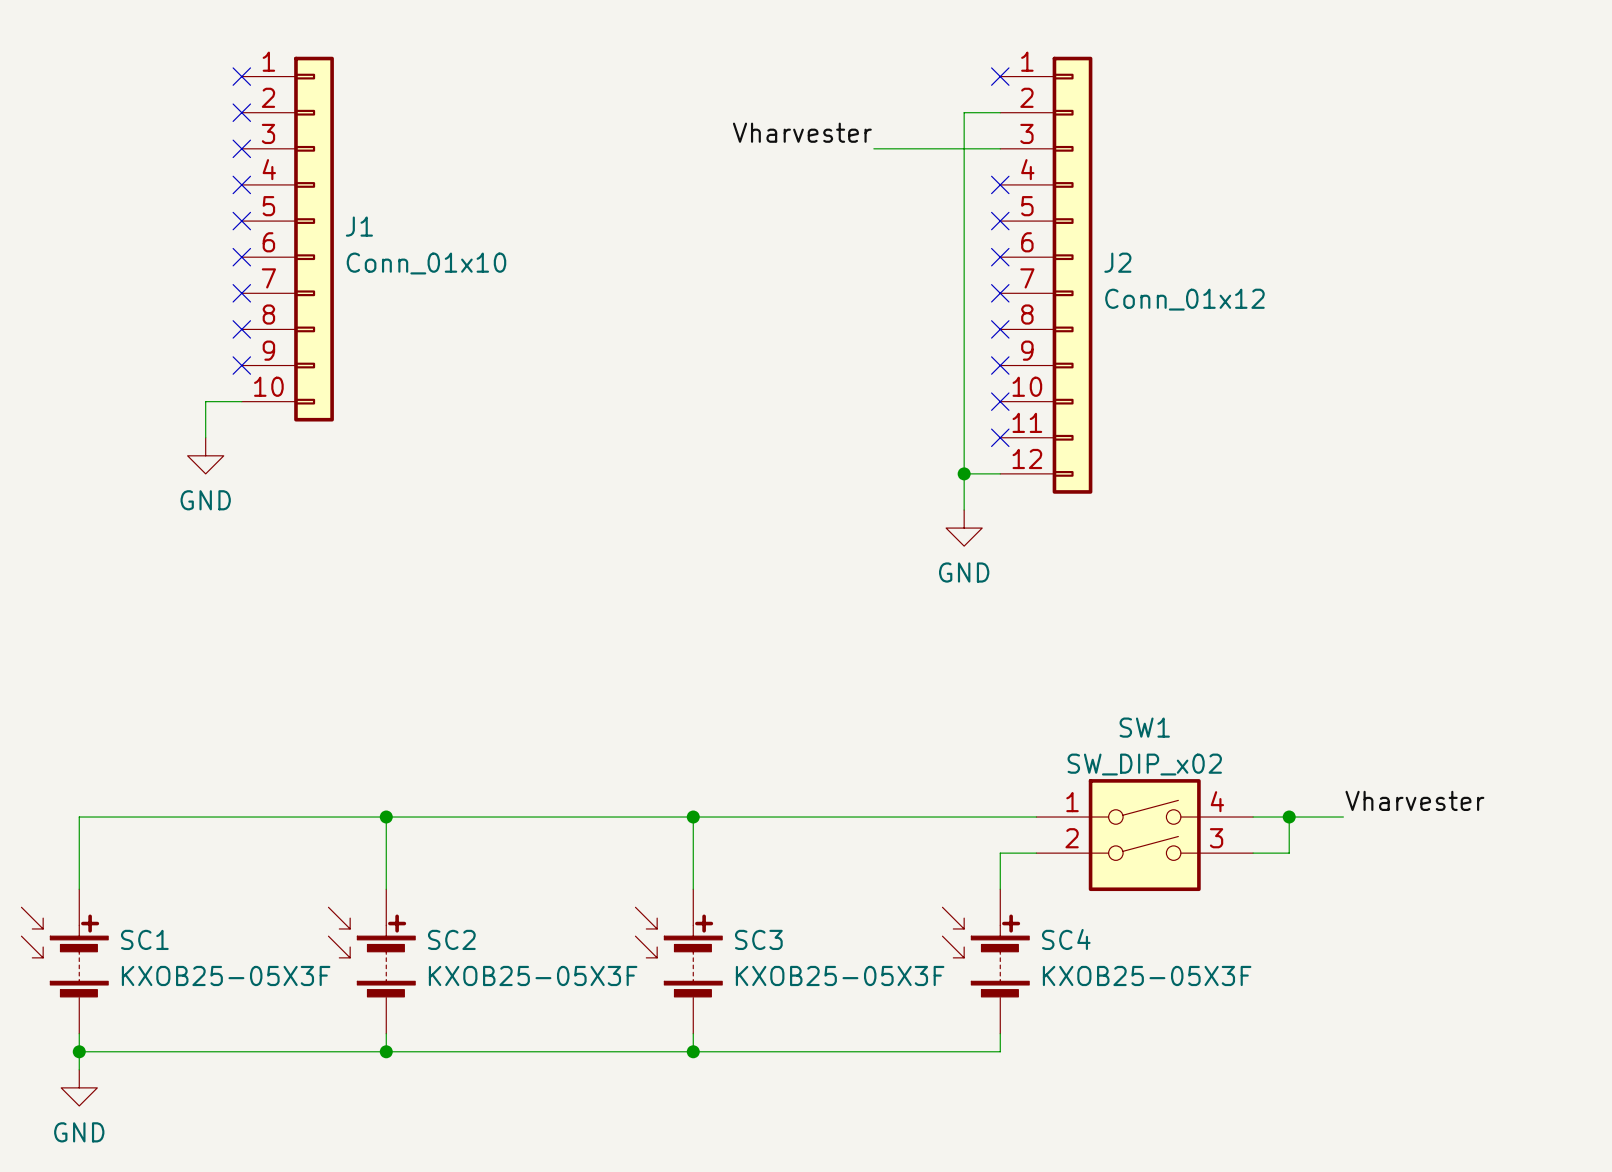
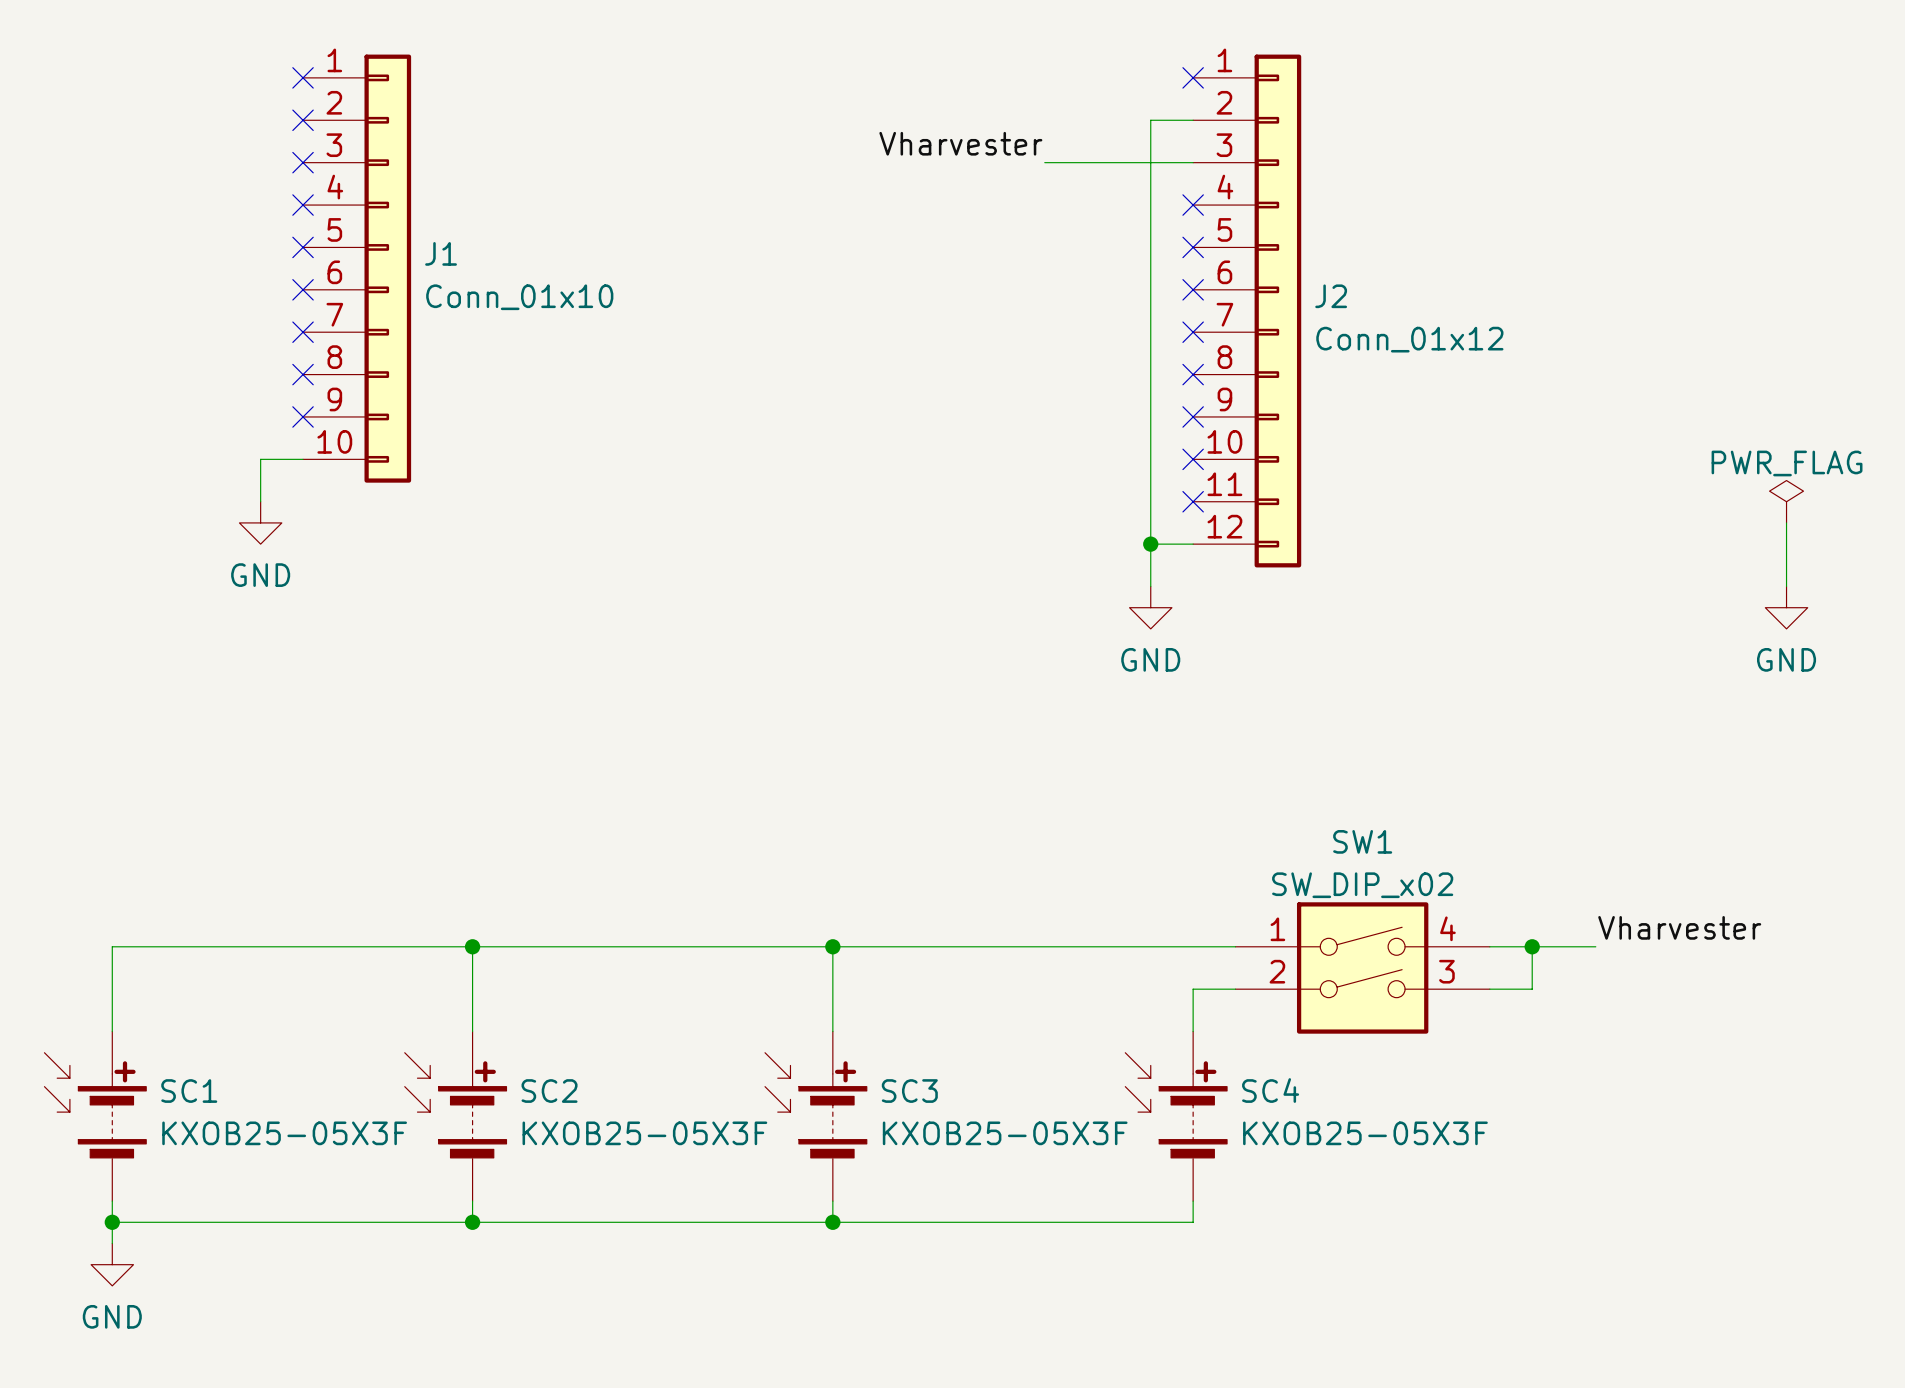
power symbol: none -> PWR_FLAG (1786, 501)
wire: none -> (1786, 522) (1786, 586)
power symbol: none -> GND (1786, 607)

